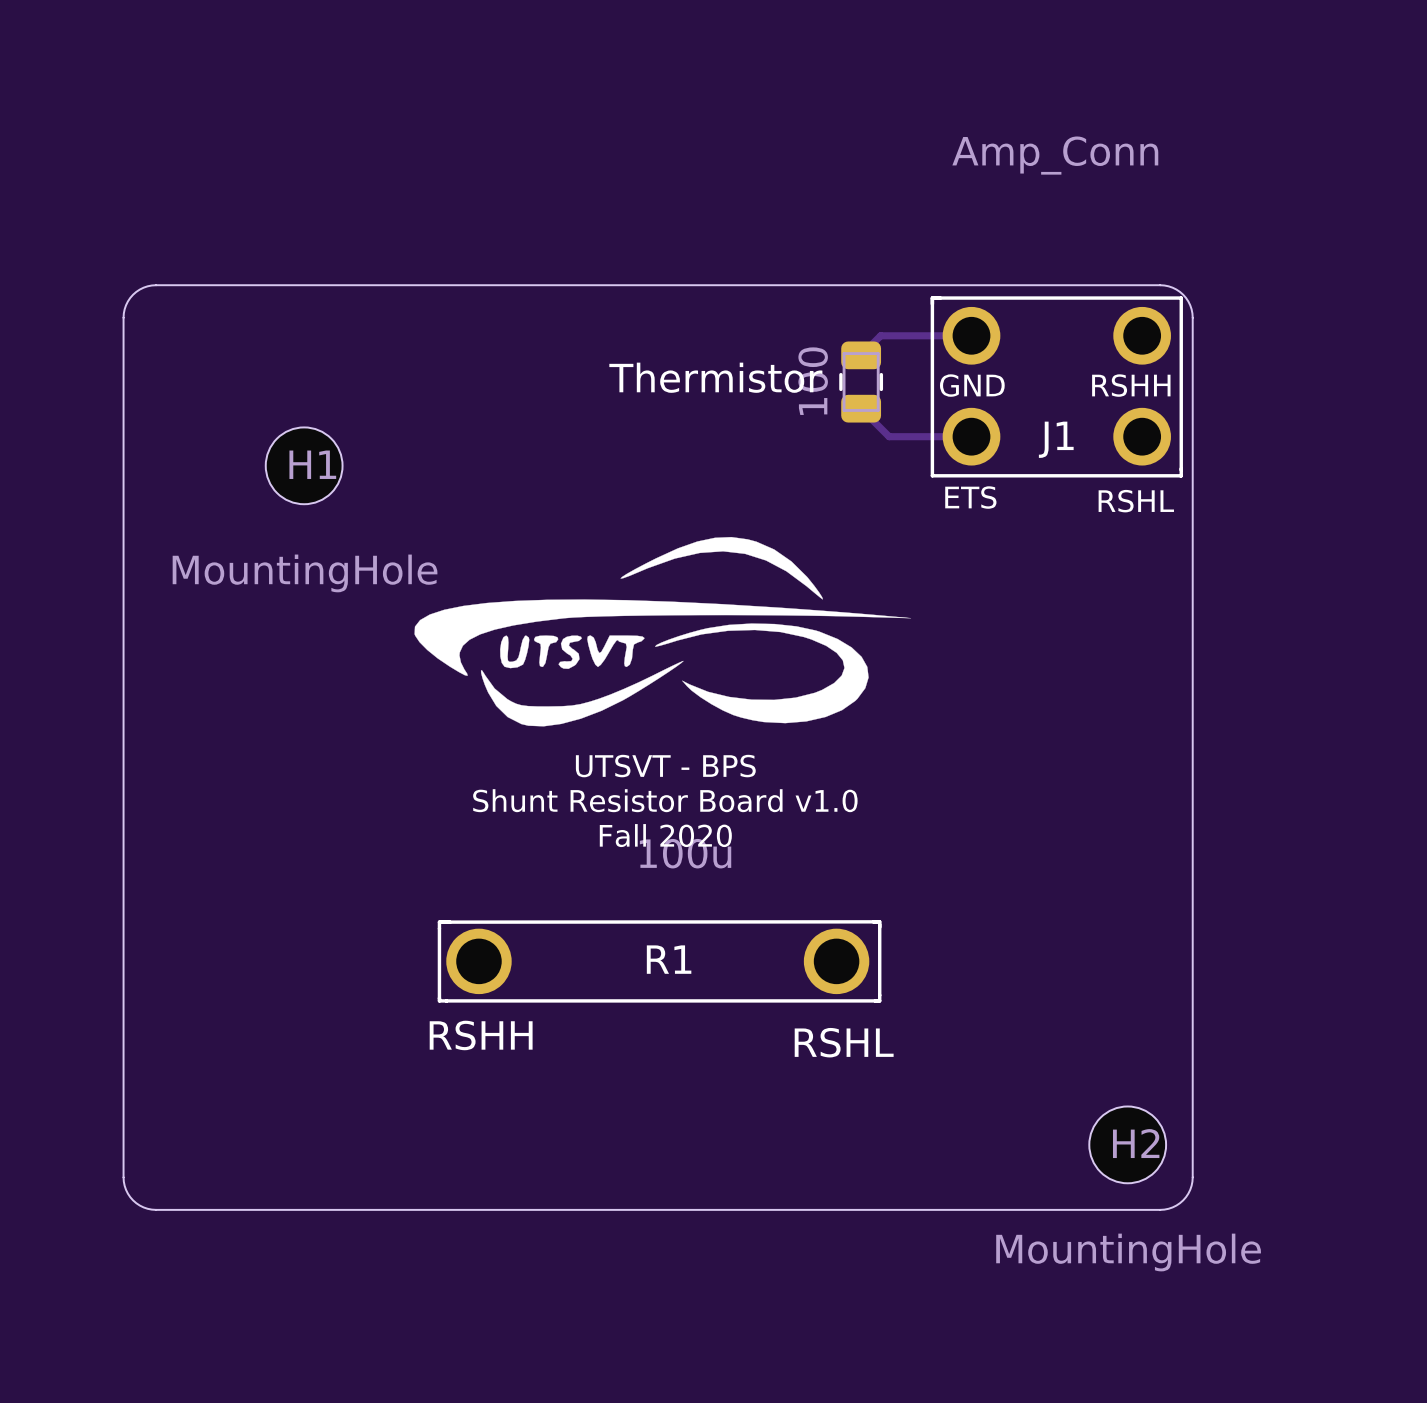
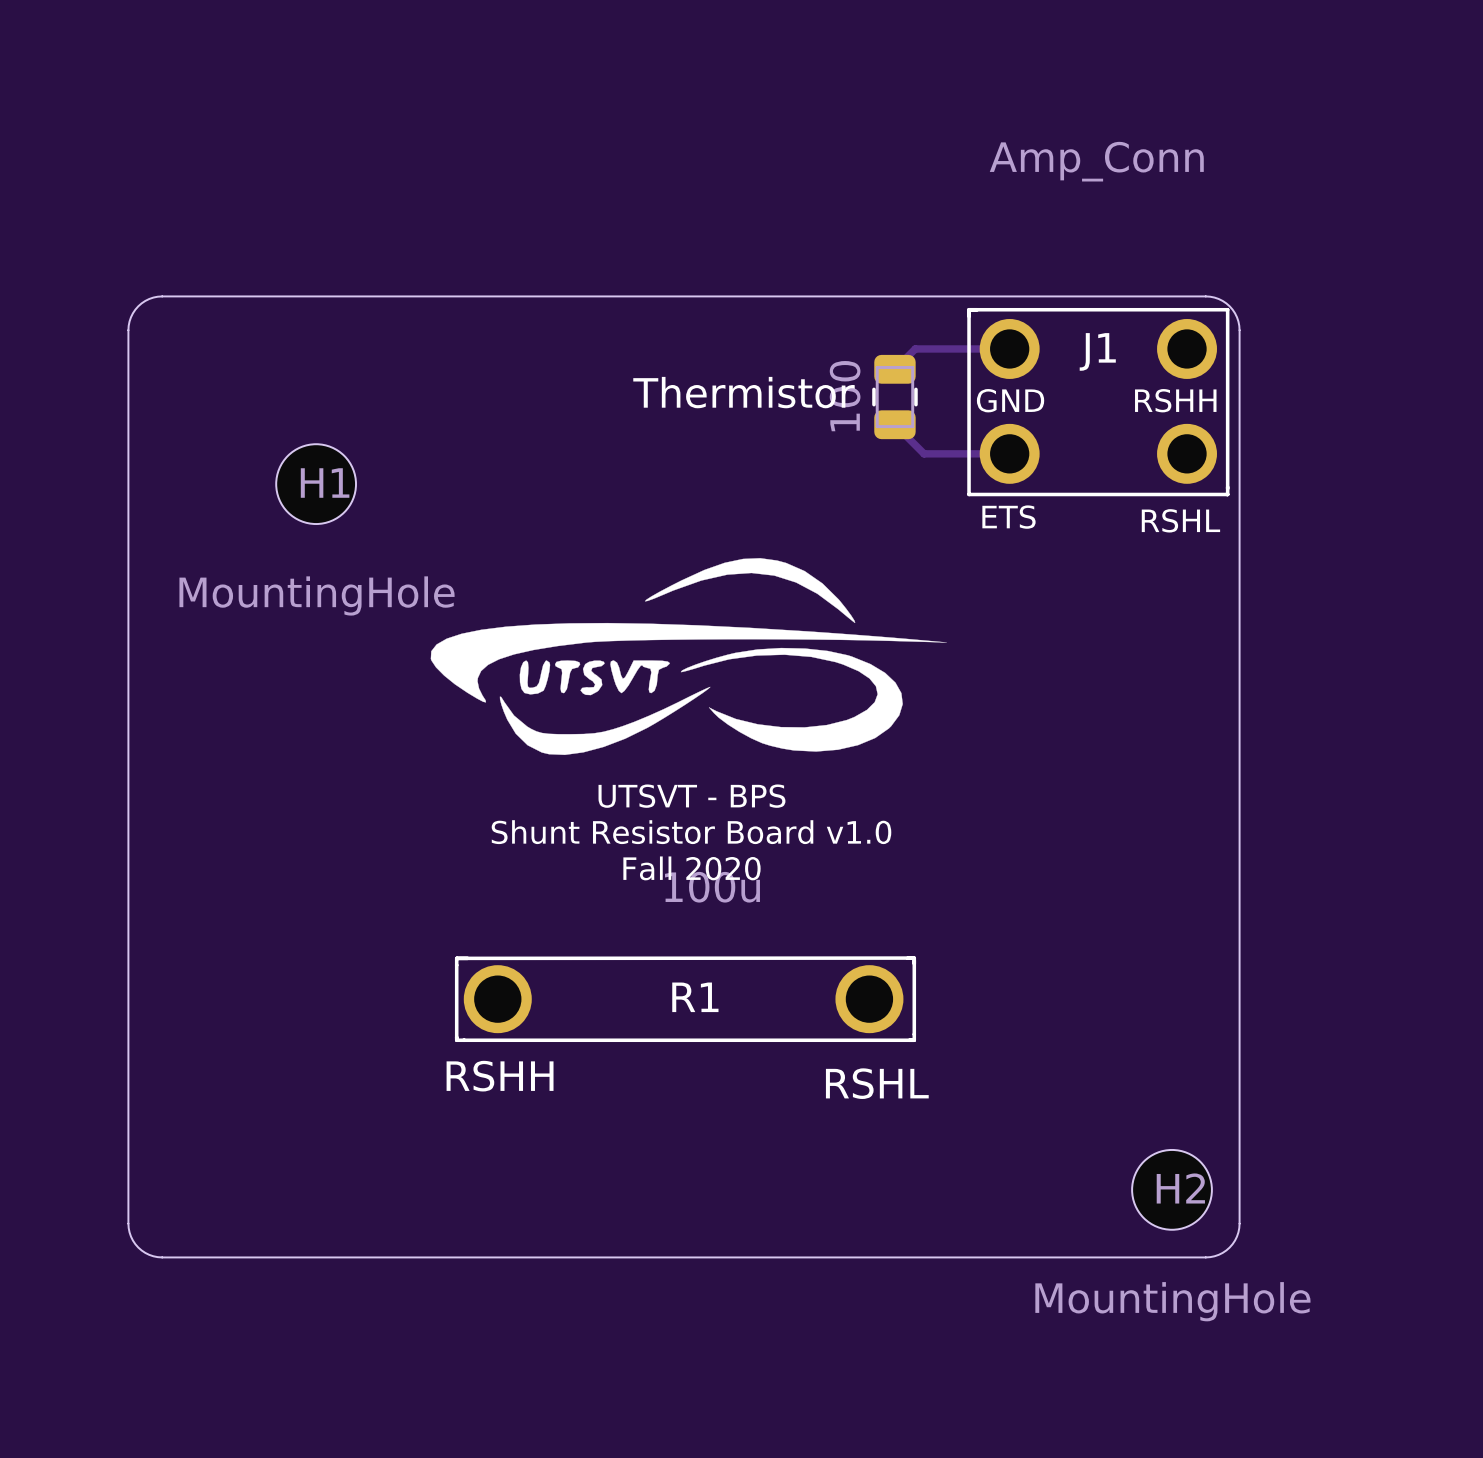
J1 name position: J1 (1056, 439) -> J1 (1097, 351)

